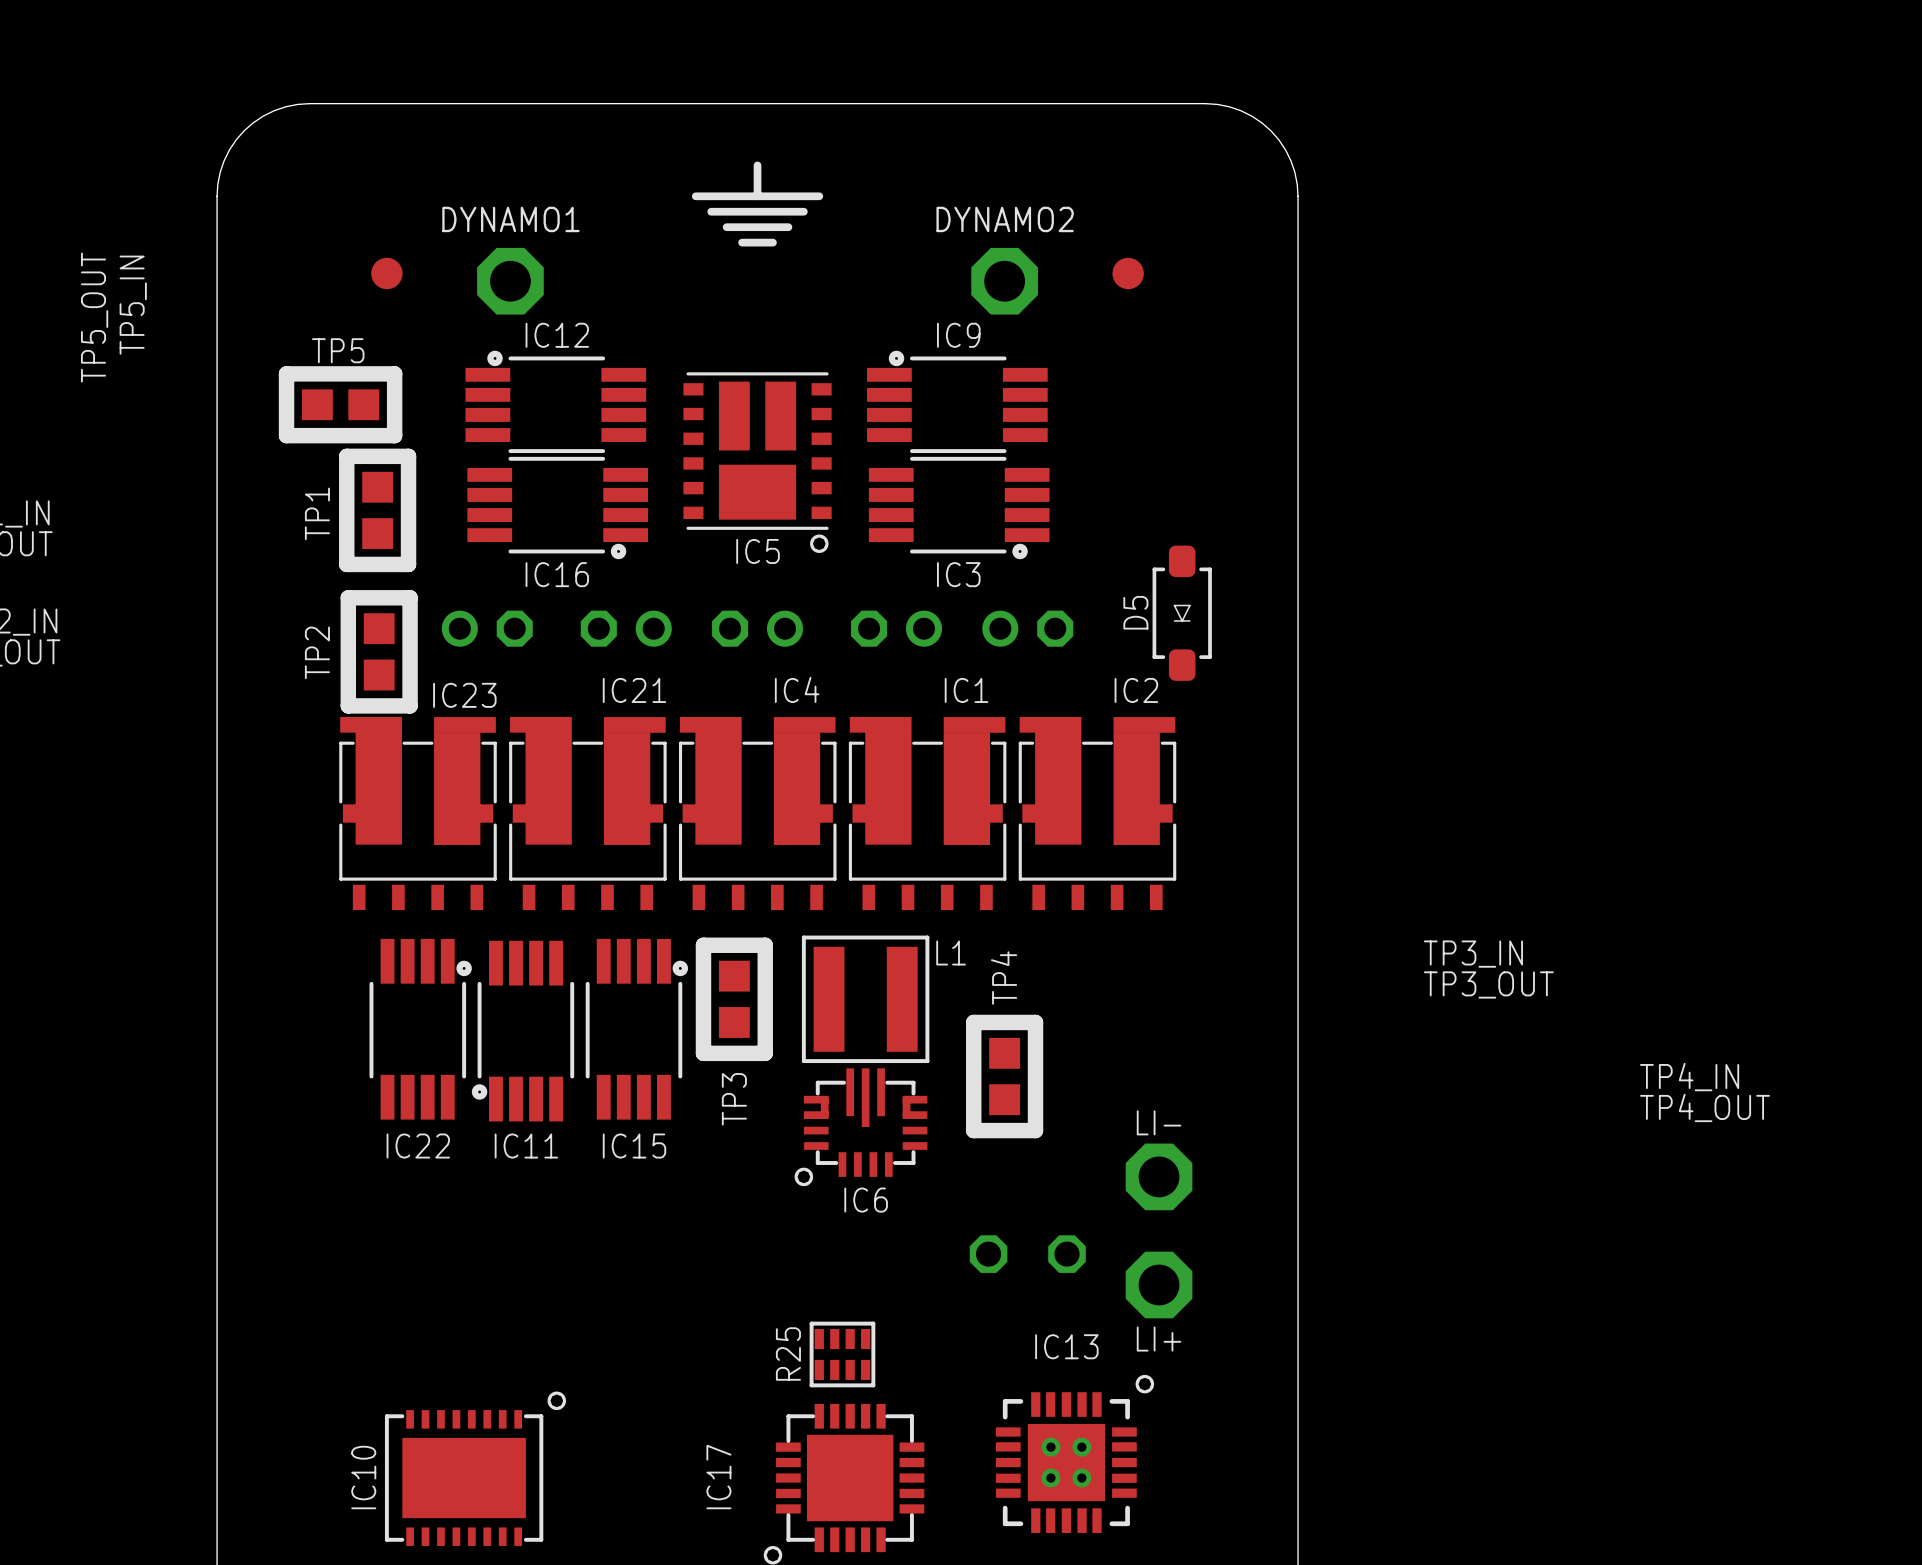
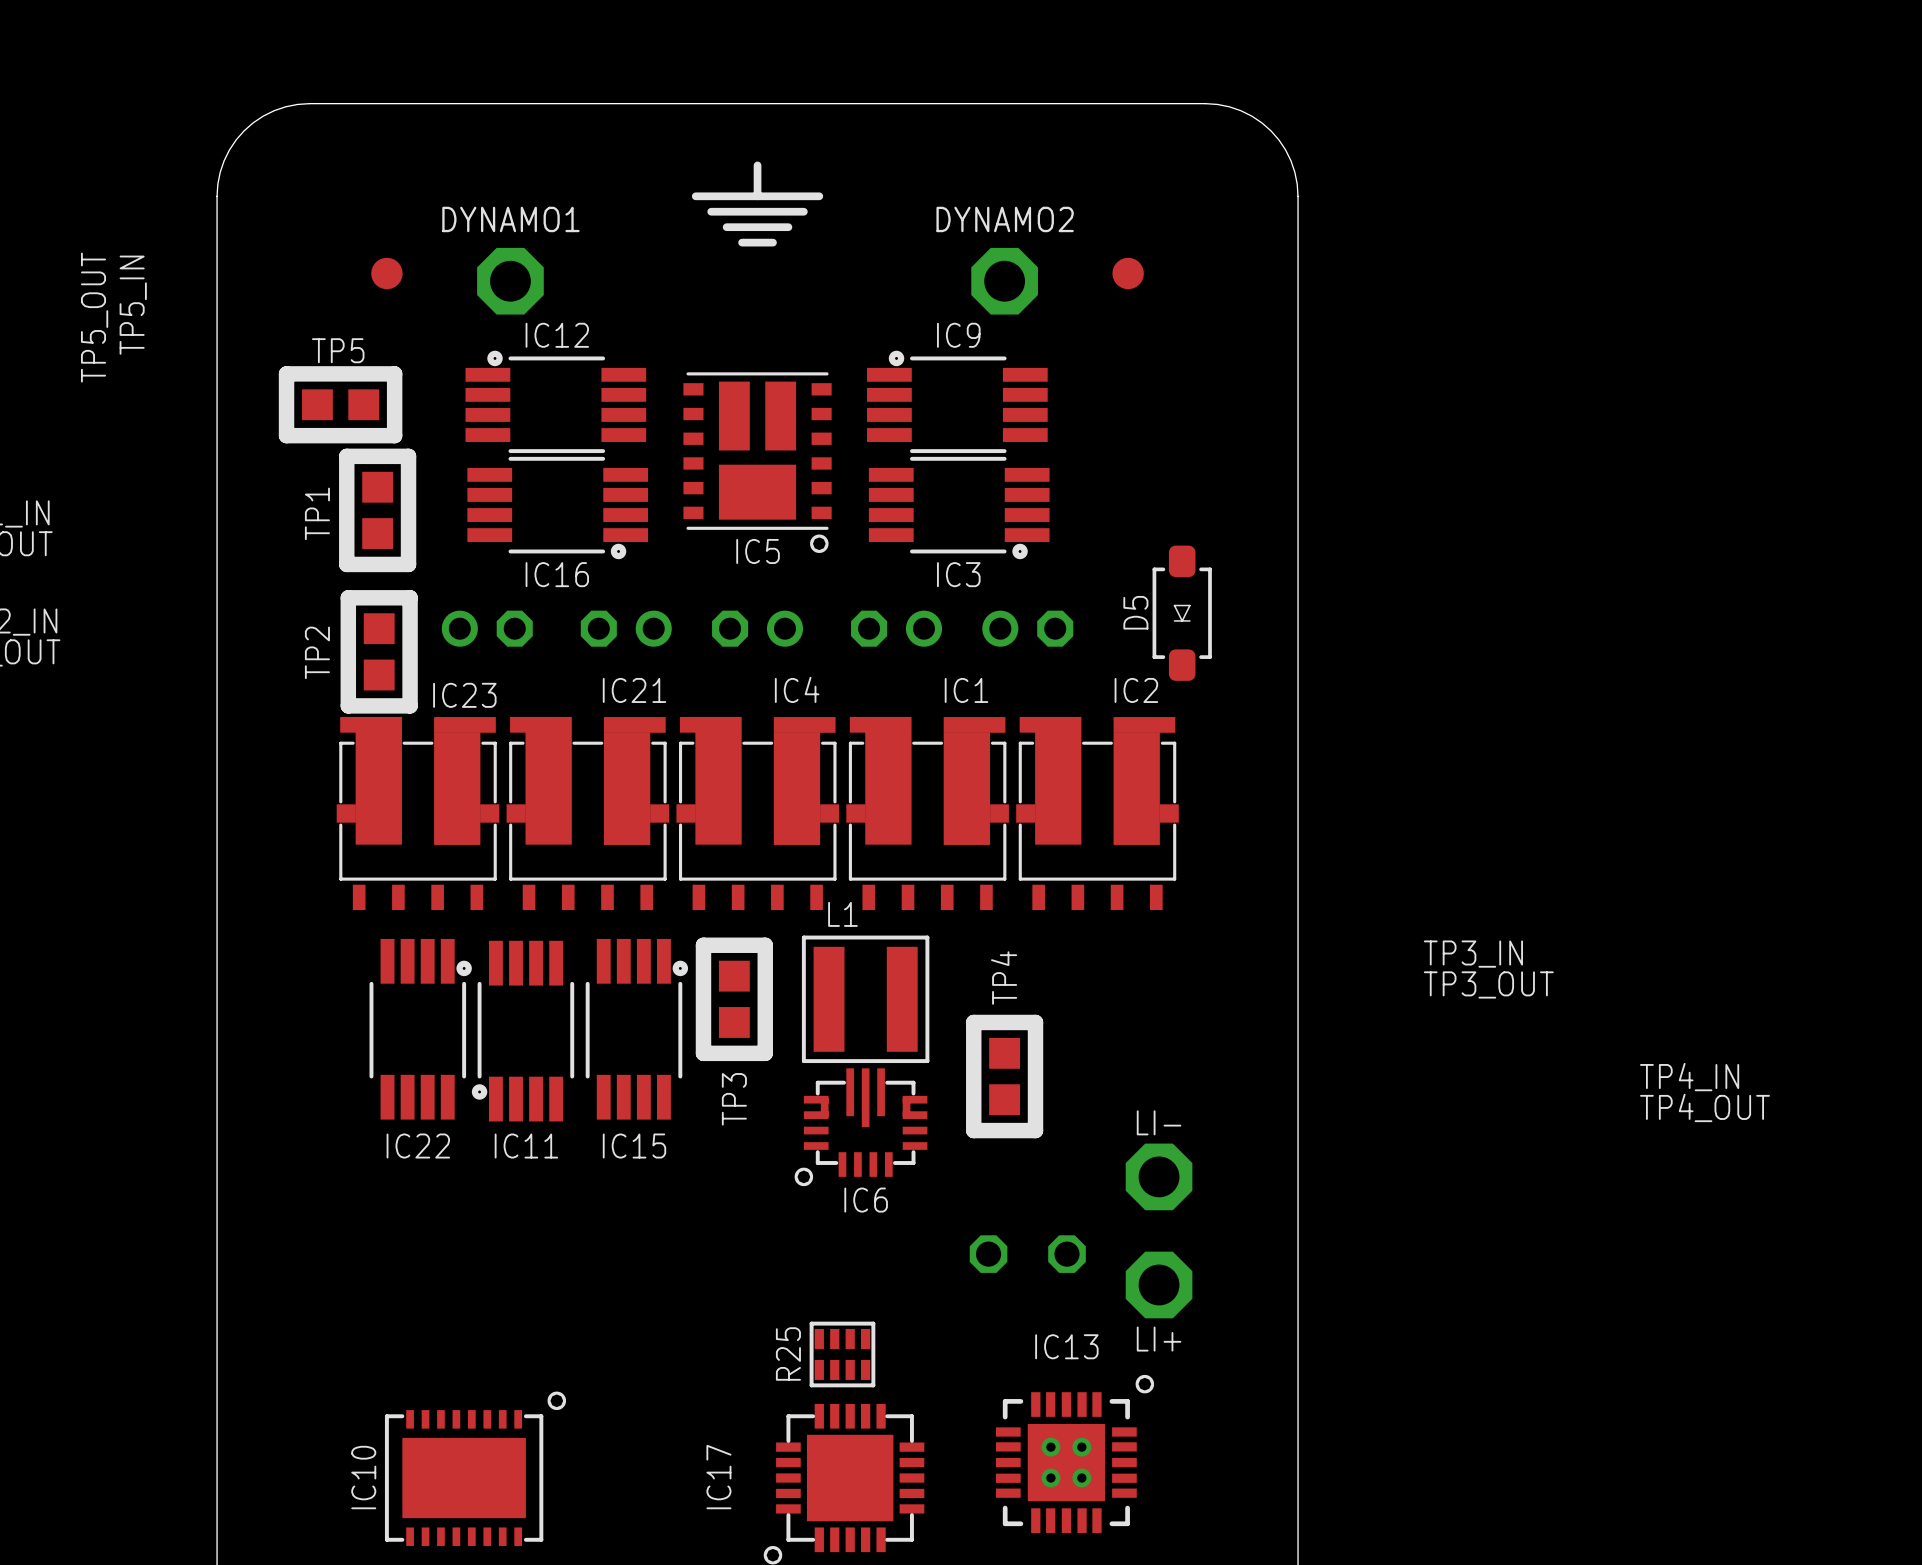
IC23 footprint: [339, 716, 497, 911] -> [336, 716, 500, 911]
IC21 footprint: [509, 716, 667, 911] -> [506, 716, 670, 911]
IC4 footprint: [678, 716, 837, 911] -> [676, 716, 840, 911]
IC1 footprint: [848, 716, 1007, 911] -> [846, 716, 1009, 911]
IC2 footprint: [1018, 716, 1177, 911] -> [1016, 716, 1179, 911]
L1 name position: L1 (951, 952) -> L1 (842, 914)

